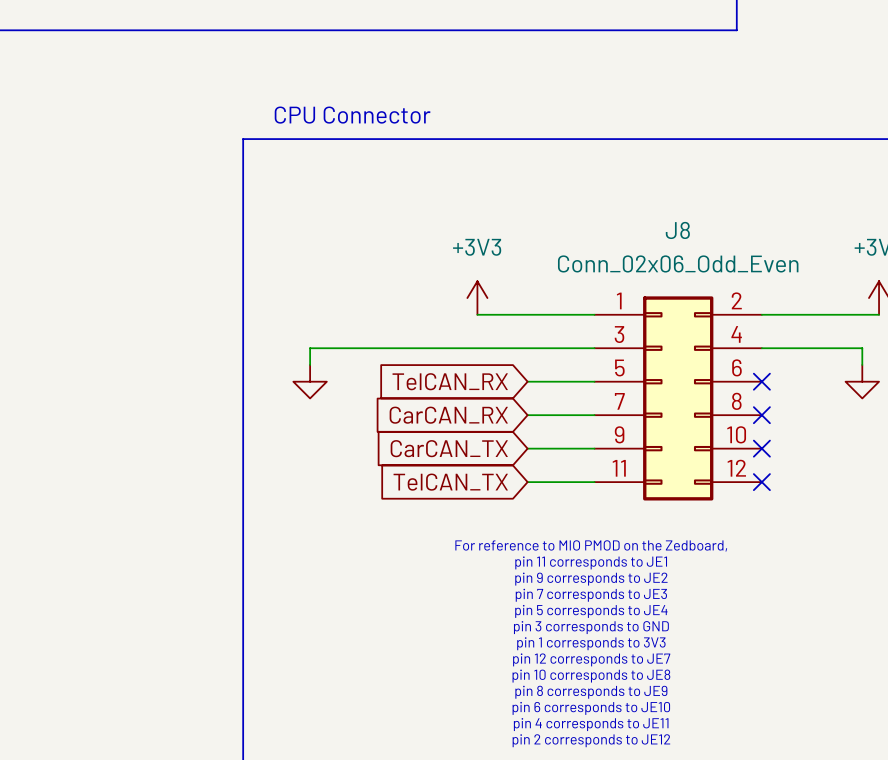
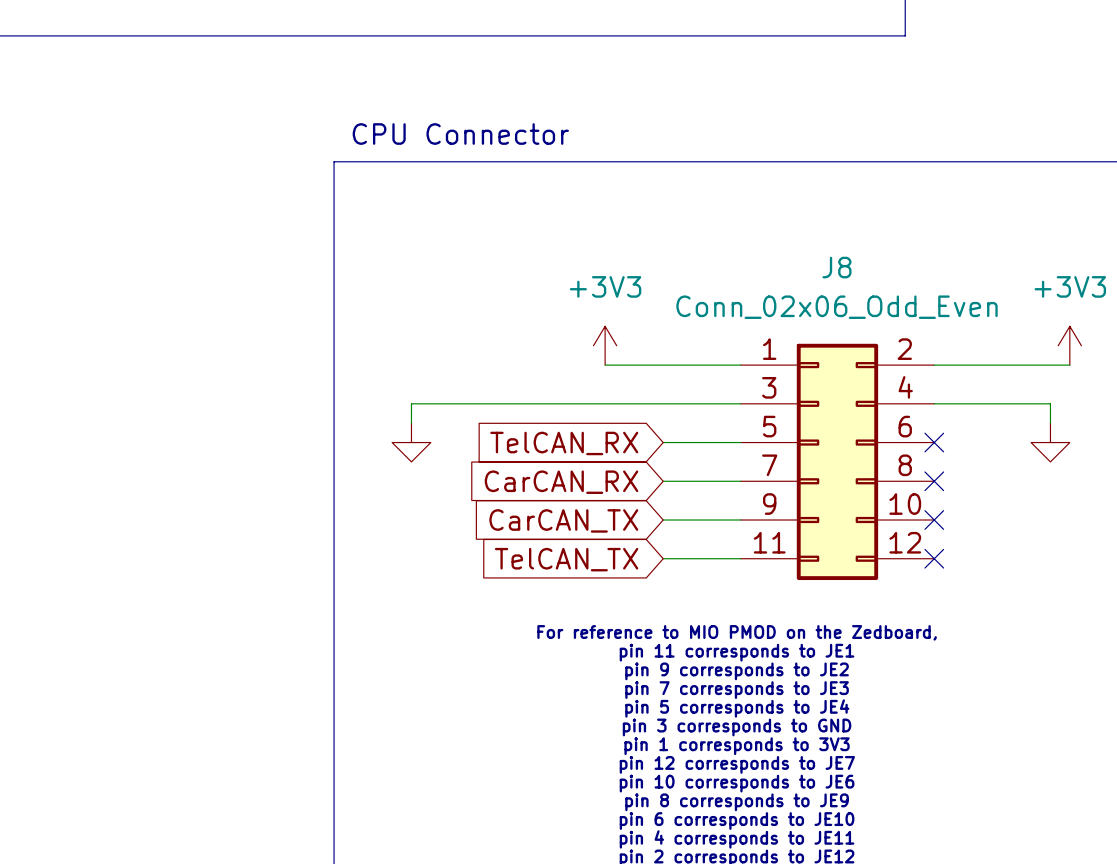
text: pin 10 corresponds to JE8 (591, 676) -> pin 10 corresponds to JE6 (737, 783)

